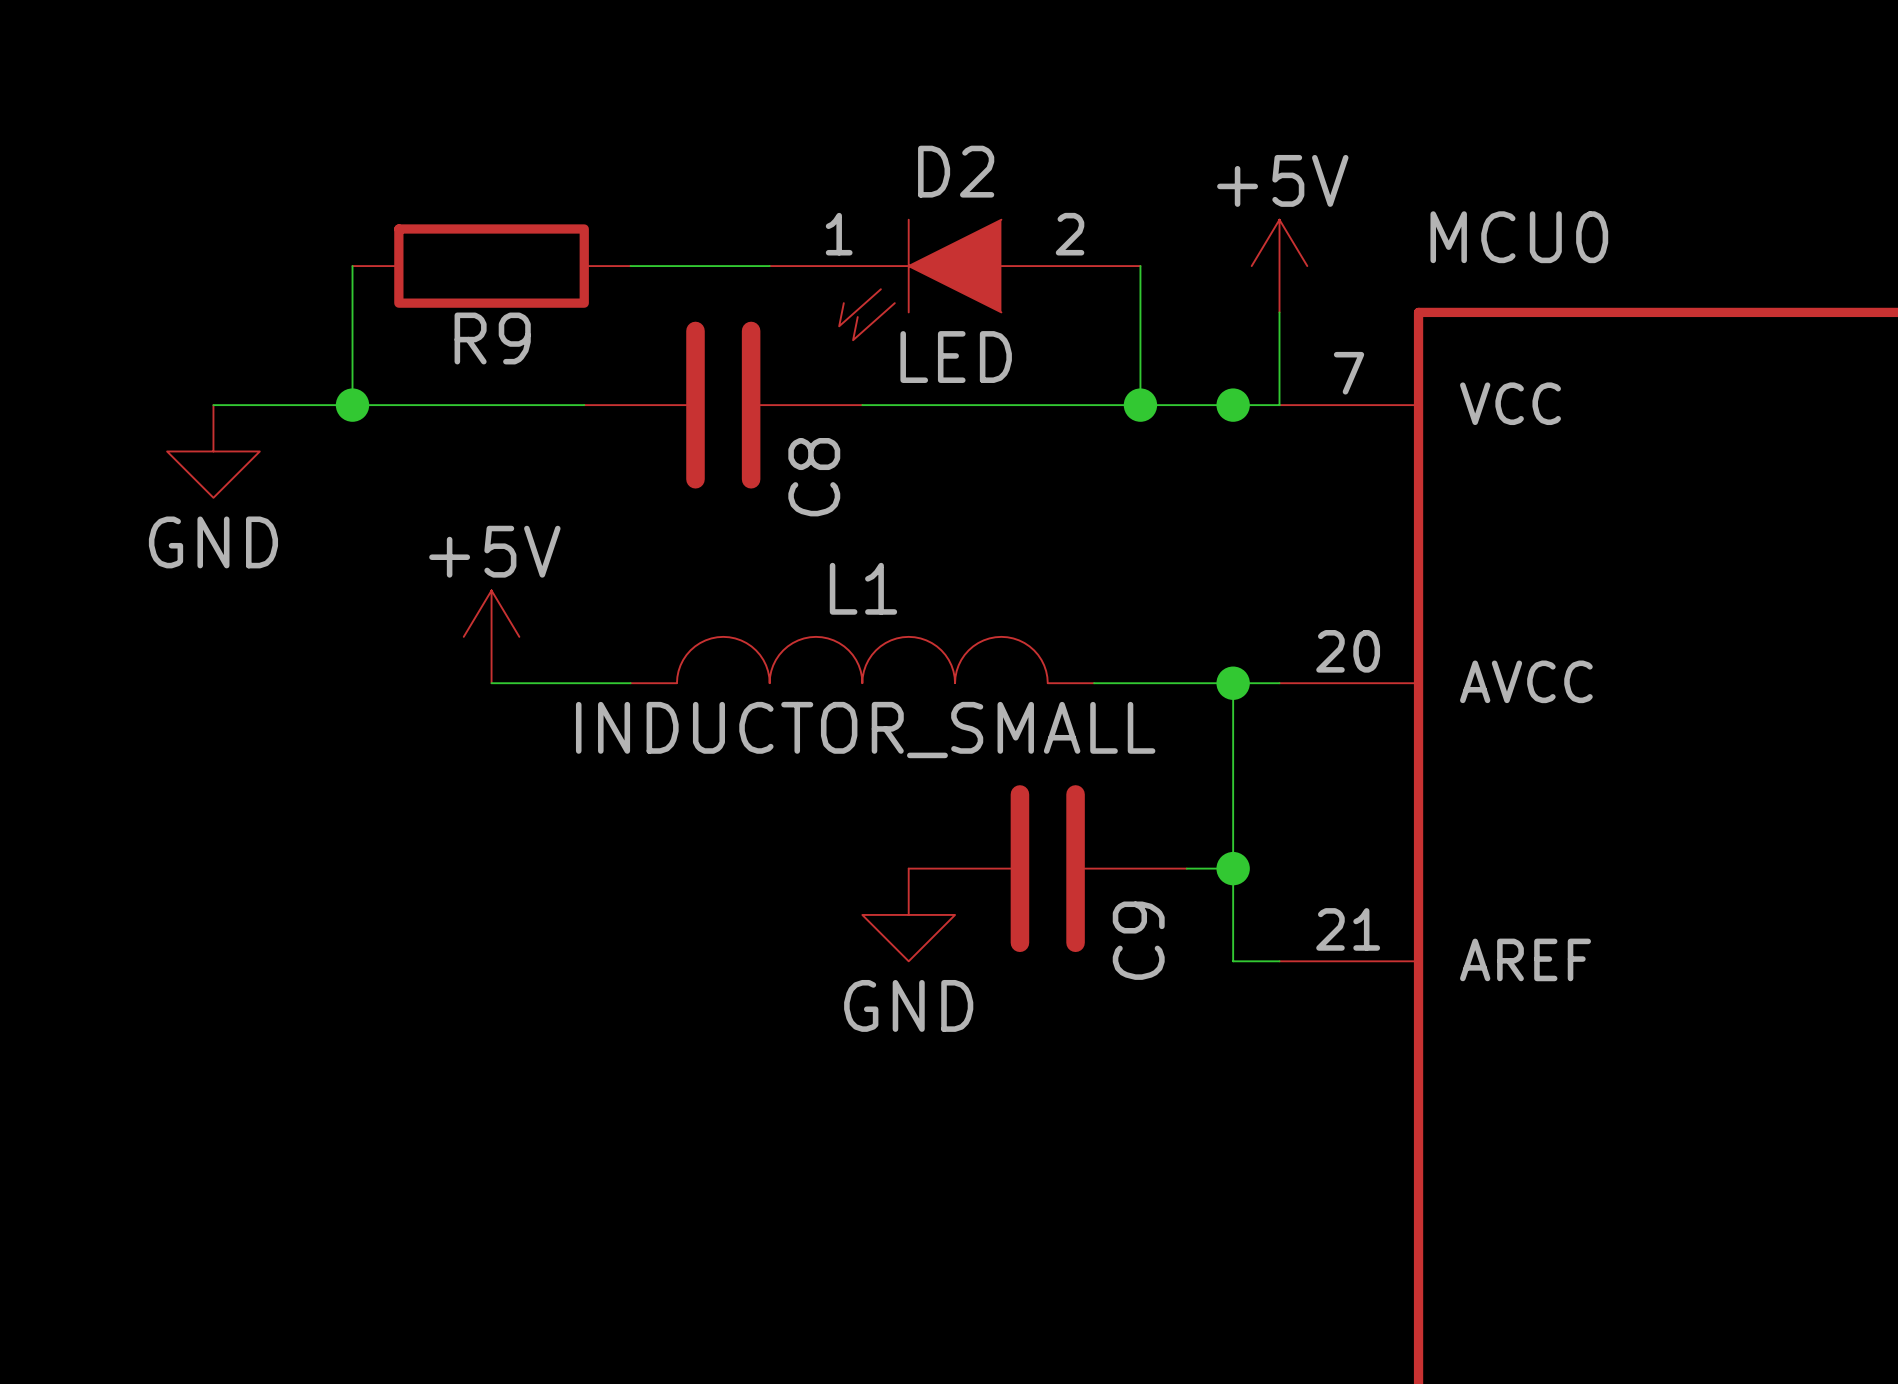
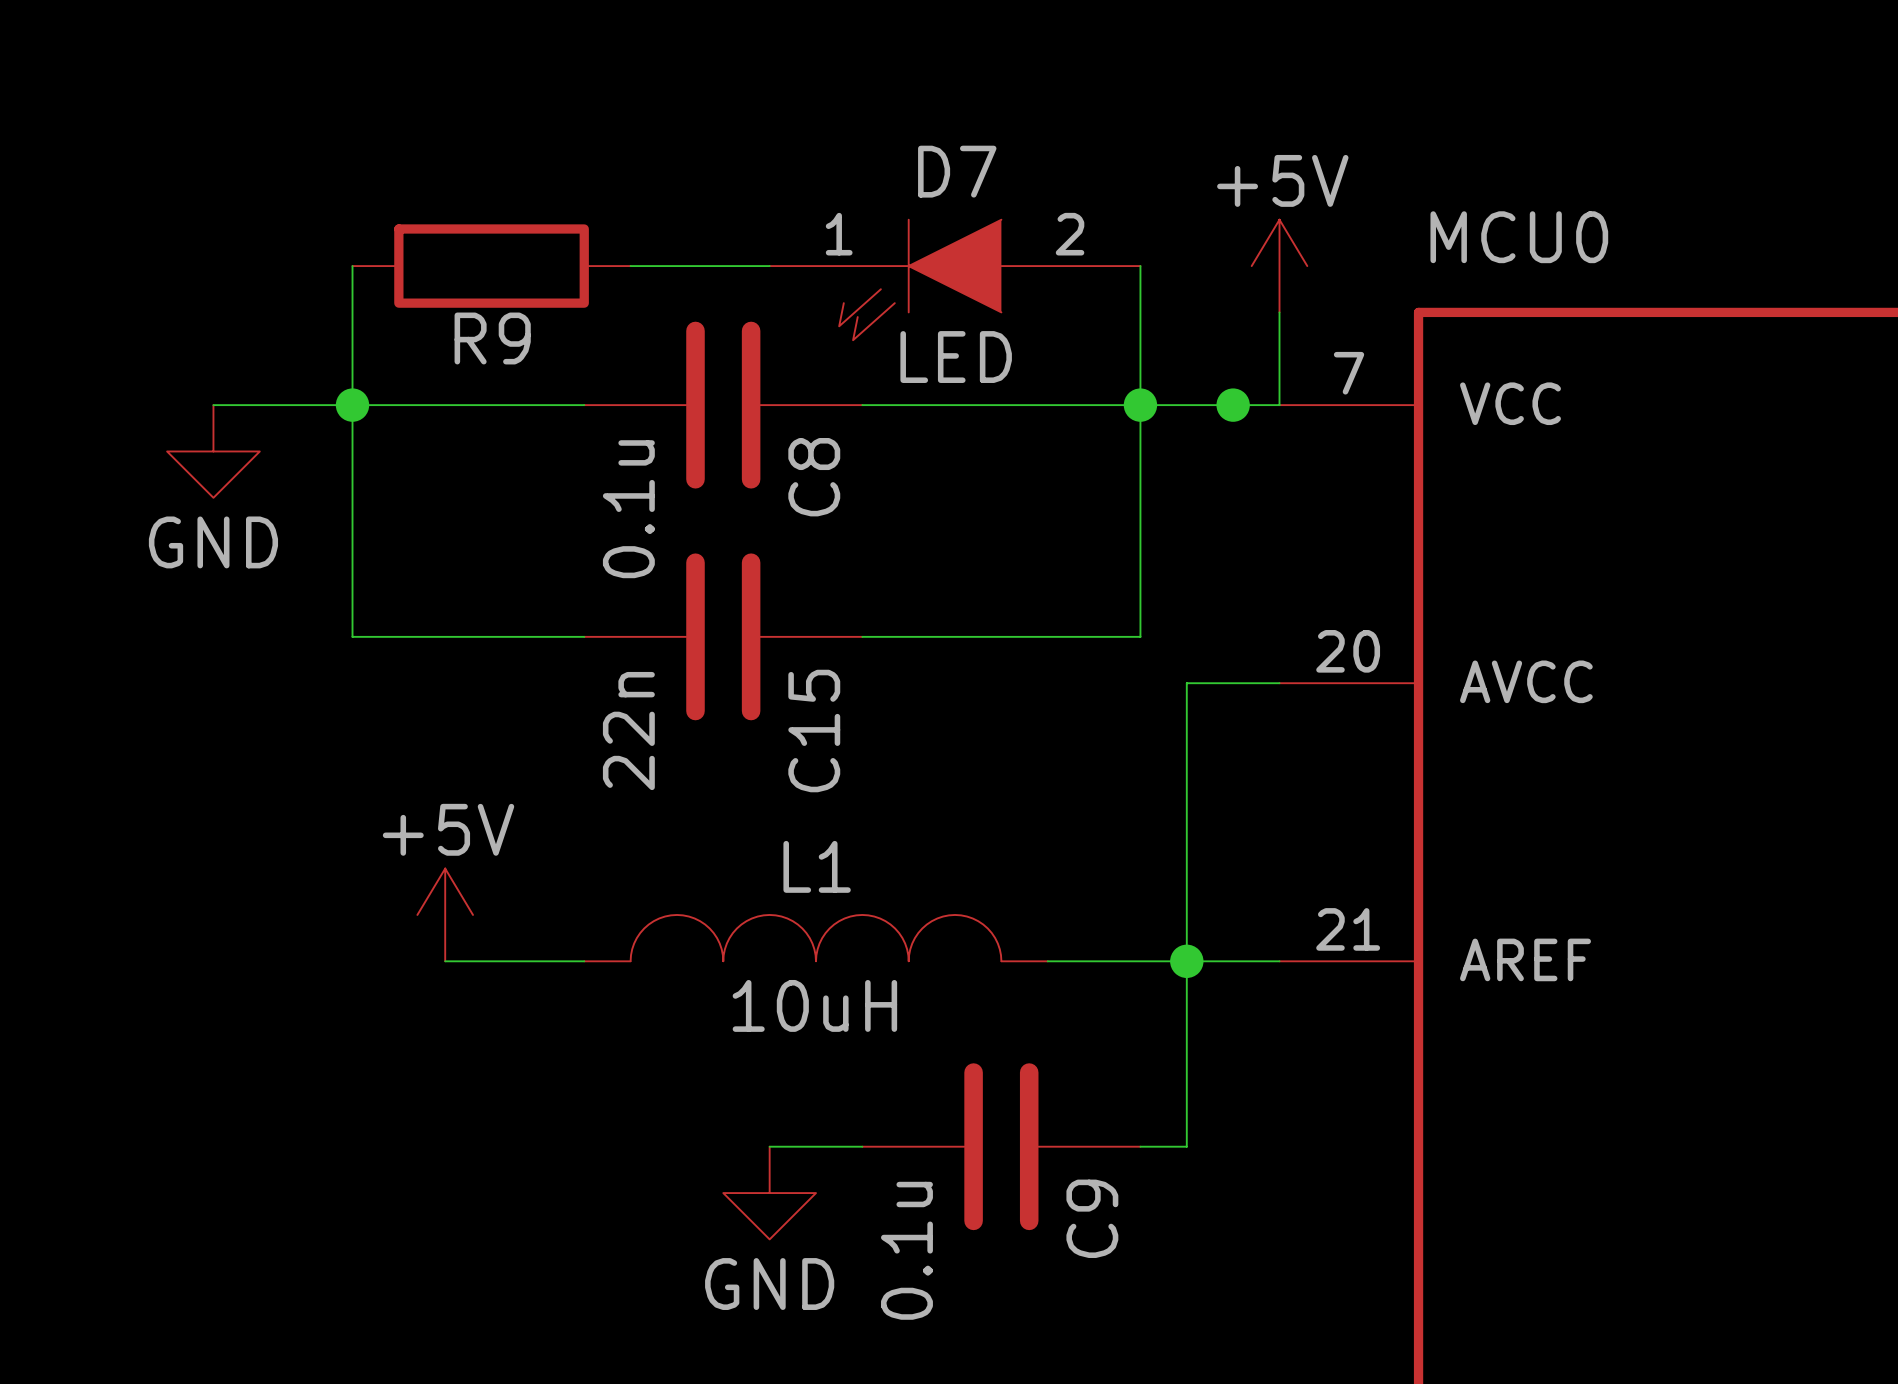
D2 name: D2 (956, 171) -> D7 (957, 171)
wire: none -> (352, 405) (352, 636) (584, 636)
wire: none -> (1140, 405) (1140, 636) (862, 636)
C8 value: none -> 0.1u (628, 509)
power symbol position: +5V (491, 636) -> +5V (445, 914)
C15: none -> 22n (723, 636)
L1 position: (862, 660) -> (816, 938)
wire: (491, 683) (630, 683) -> (445, 961) (584, 961)
wire: (1094, 683) (1186, 683) -> (1140, 1146) (1186, 1146) (1186, 683)
wire: (1233, 683) (1233, 961) -> (1047, 961) (1233, 961)
junction: (1233, 683) -> none
L1 value: INDUCTOR_SMALL (865, 730) -> 10uH (814, 1005)
C9 position: (1047, 868) -> (1001, 1146)
wire: (1186, 868) (1233, 868) -> none
junction position: (1233, 868) -> (1186, 961)
power symbol position: GND (908, 914) -> GND (769, 1193)
wire: none -> (769, 1146) (862, 1146)
C9 value: none -> 0.1u (906, 1250)

